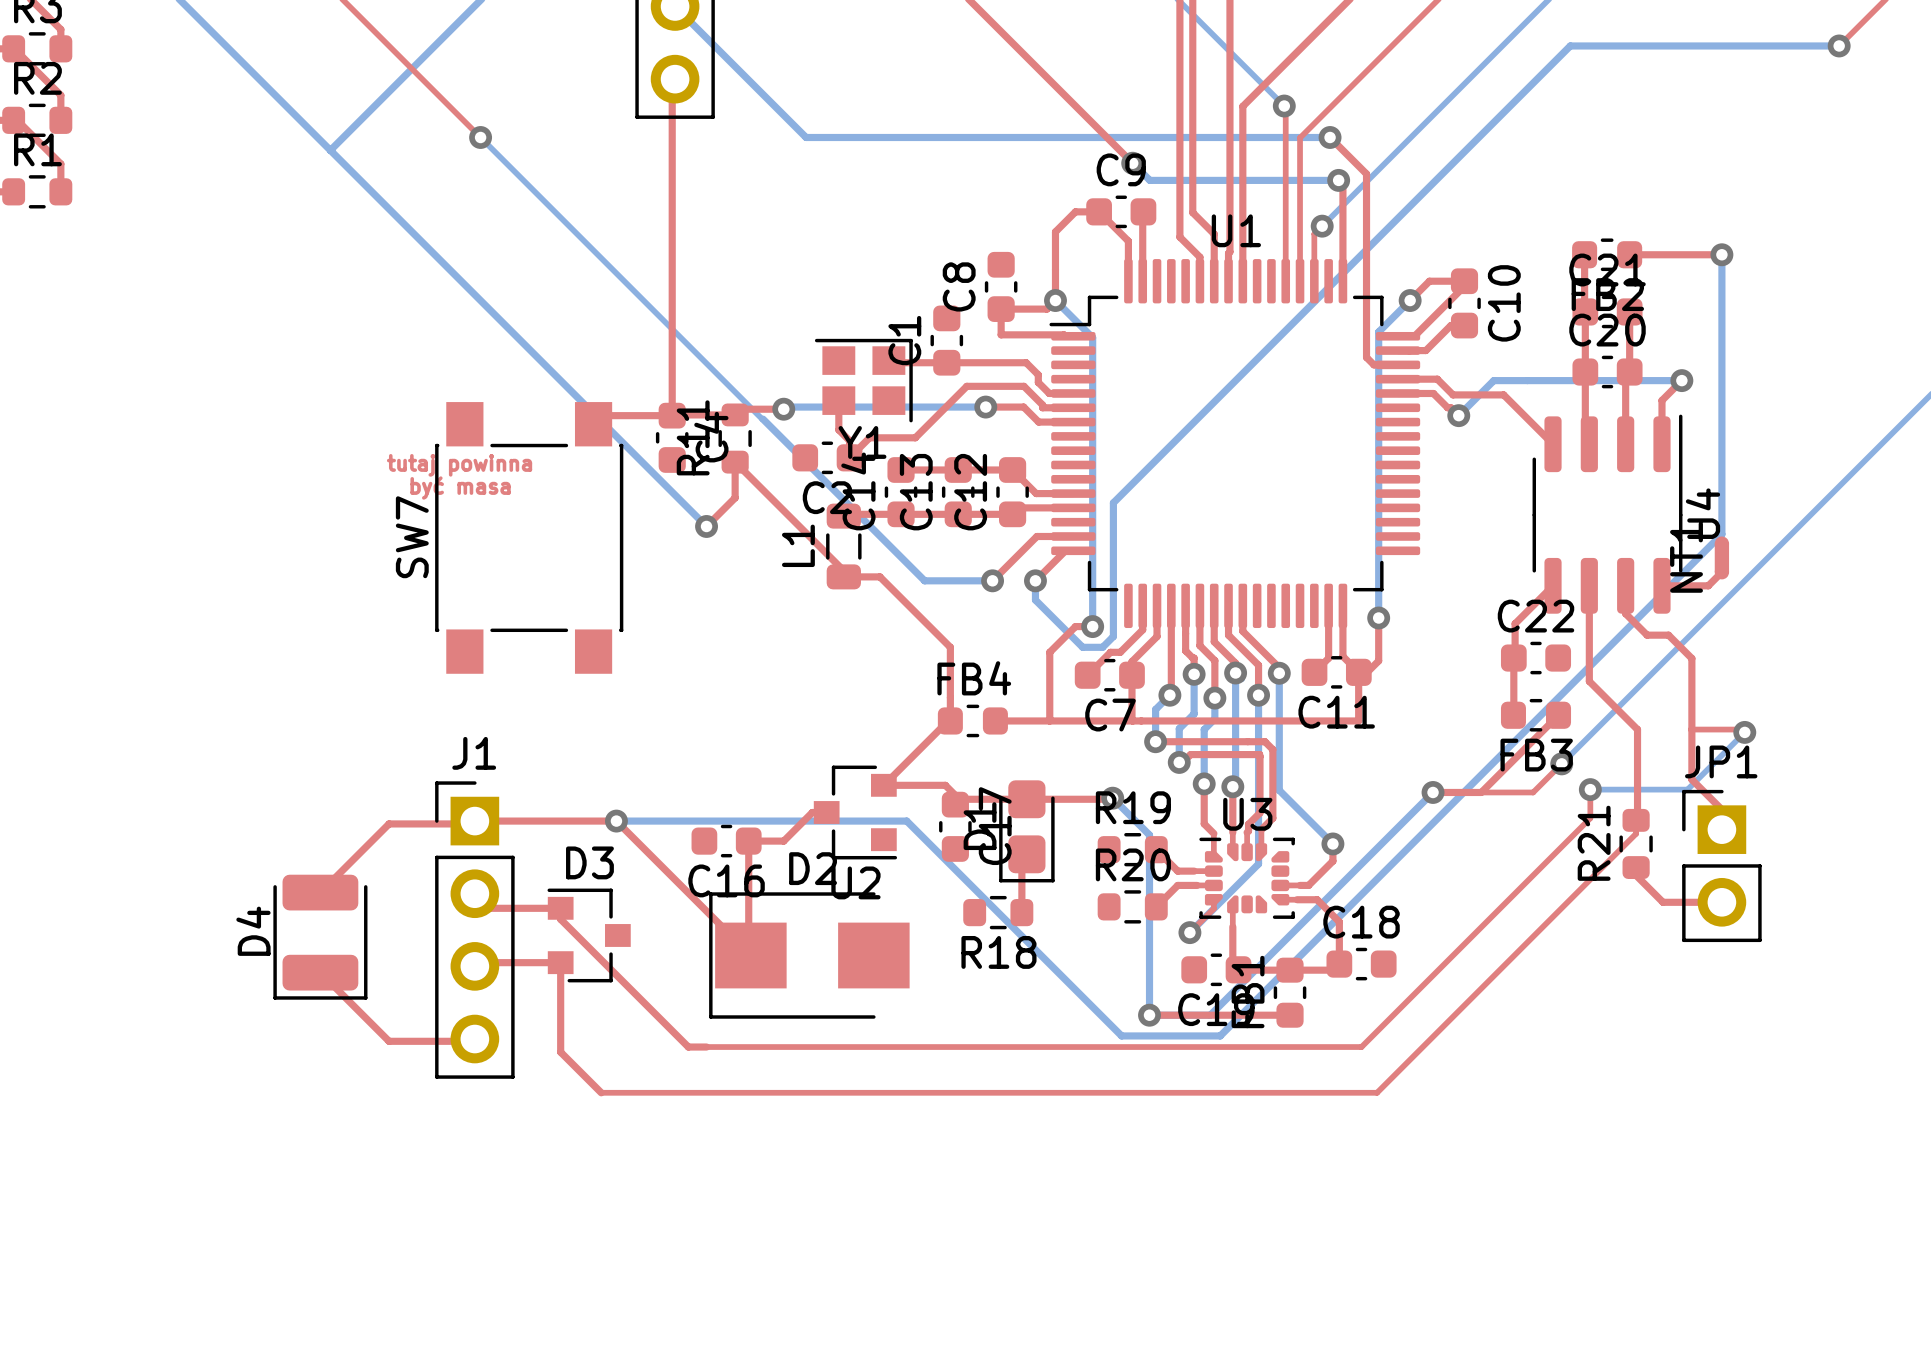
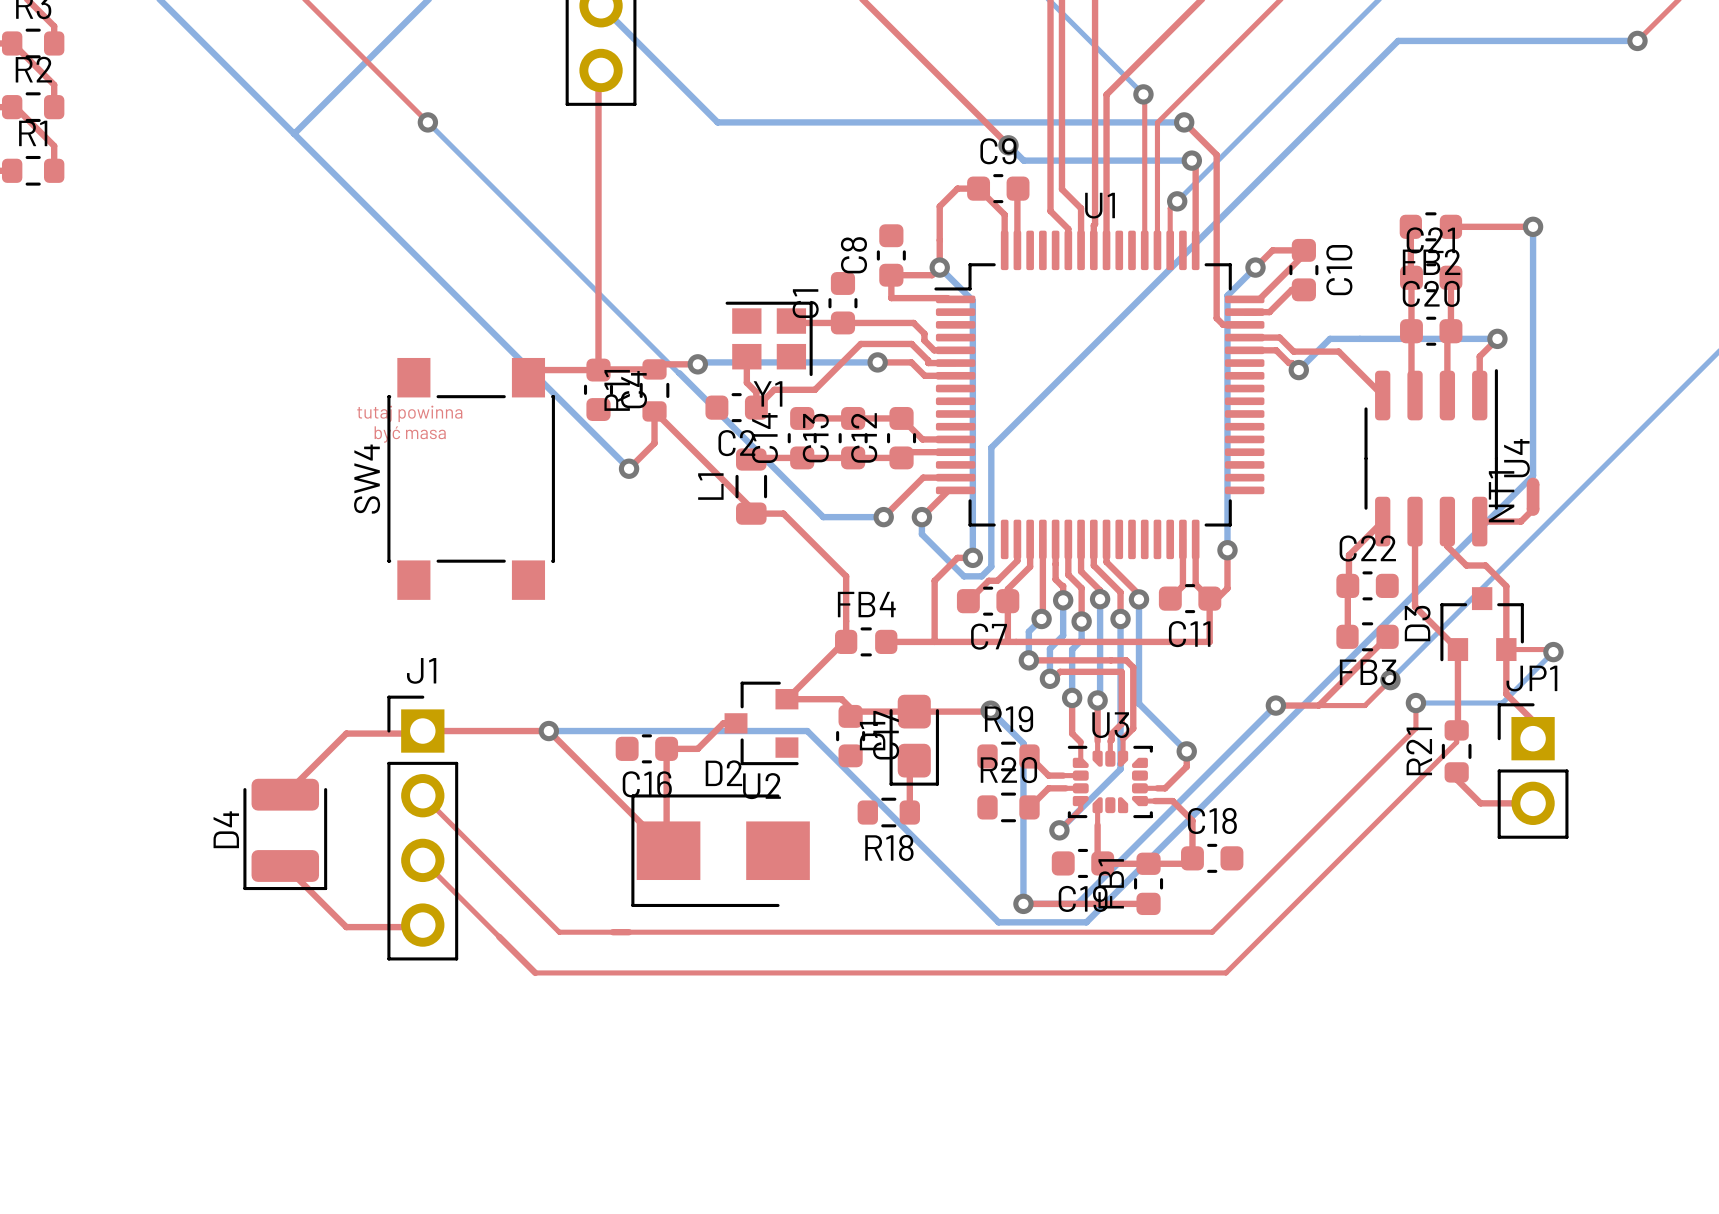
SW7 name: SW7 (412, 537) -> SW4 (367, 479)
top track: (489, 908) (560, 908) (560, 919) (688, 1047) -> (435, 808) (559, 932) (612, 932)
D3 rotation: 0° (589, 935) -> 90° counterclockwise (1482, 624)
D3 position: (589, 935) -> (1482, 624)
top track: (474, 966) (478, 962) (560, 962) (560, 1052) -> (422, 860) (499, 936)

